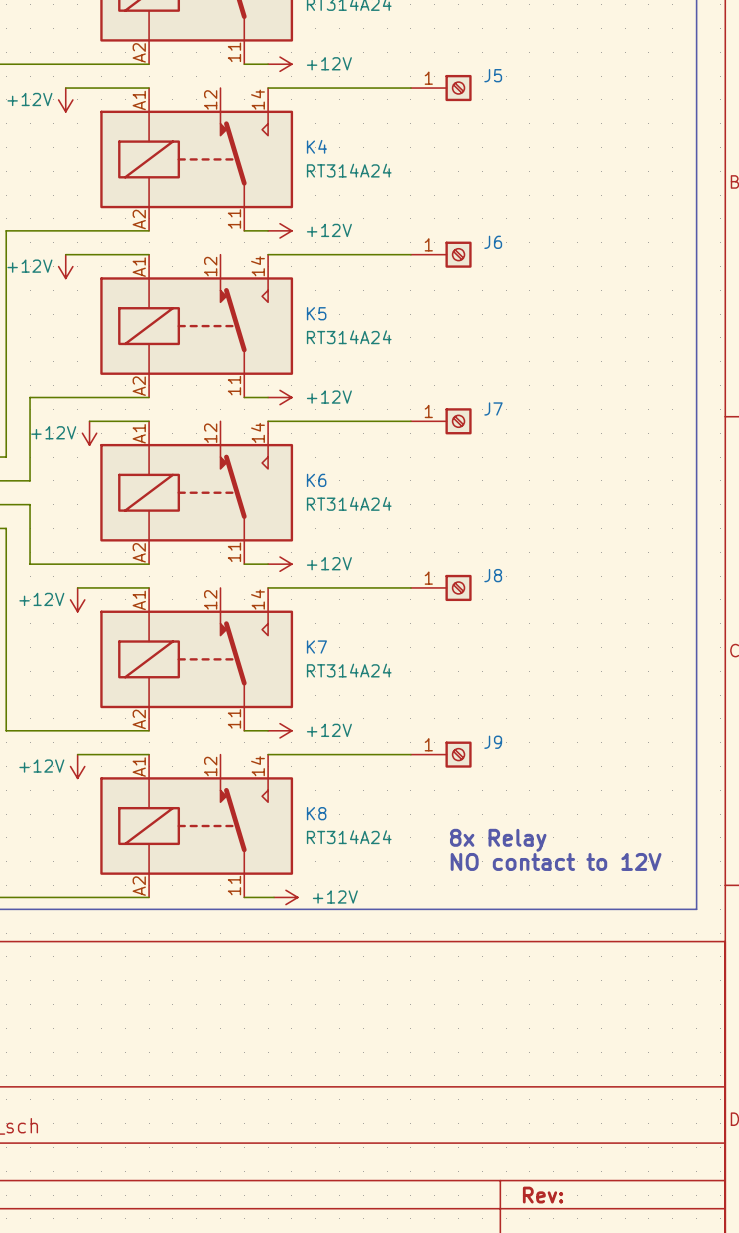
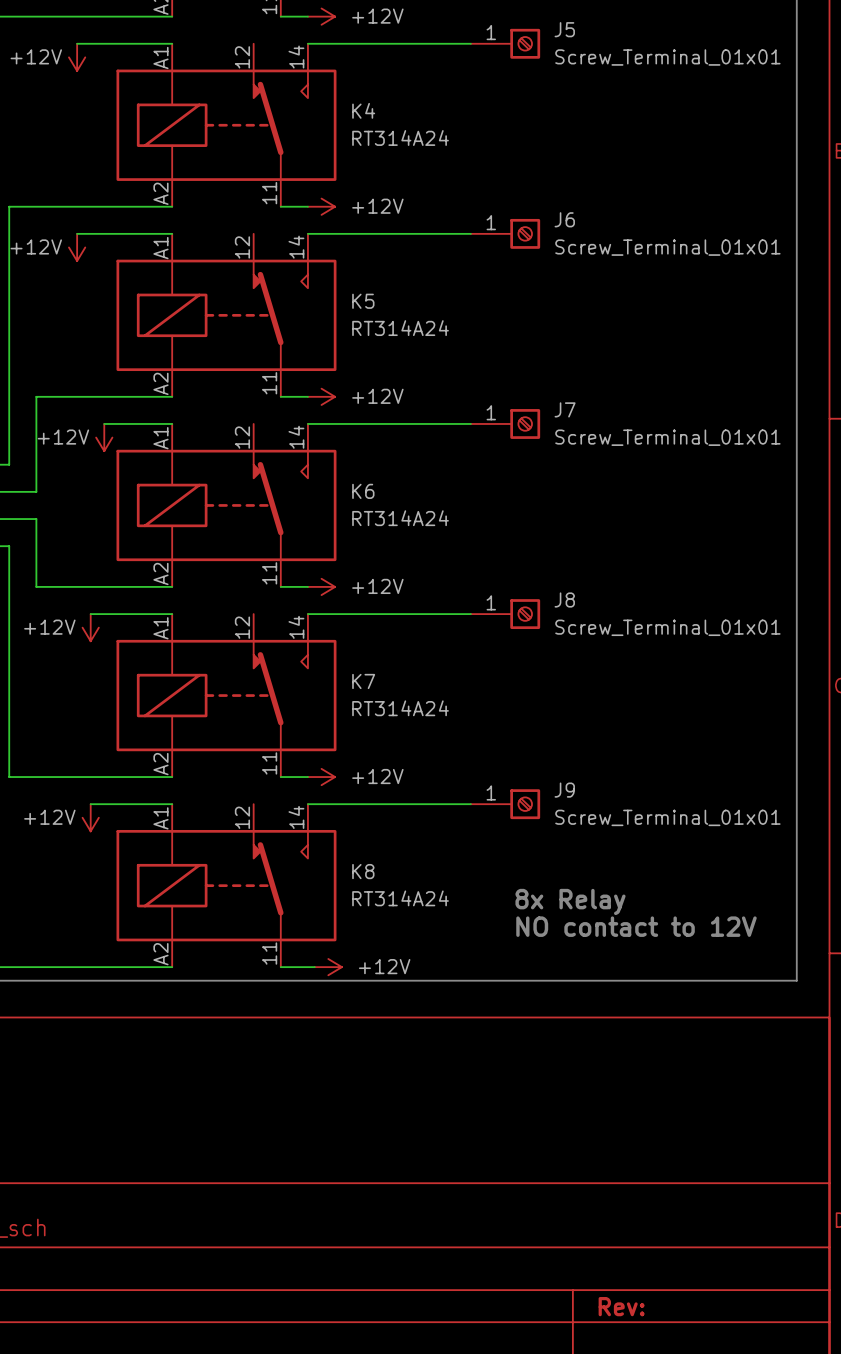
J5 value: none -> Screw_Terminal_01x01 (667, 57)
J6 value: none -> Screw_Terminal_01x01 (667, 247)
J7 value: none -> Screw_Terminal_01x01 (667, 437)
J8 value: none -> Screw_Terminal_01x01 (667, 627)
J9 value: none -> Screw_Terminal_01x01 (667, 817)

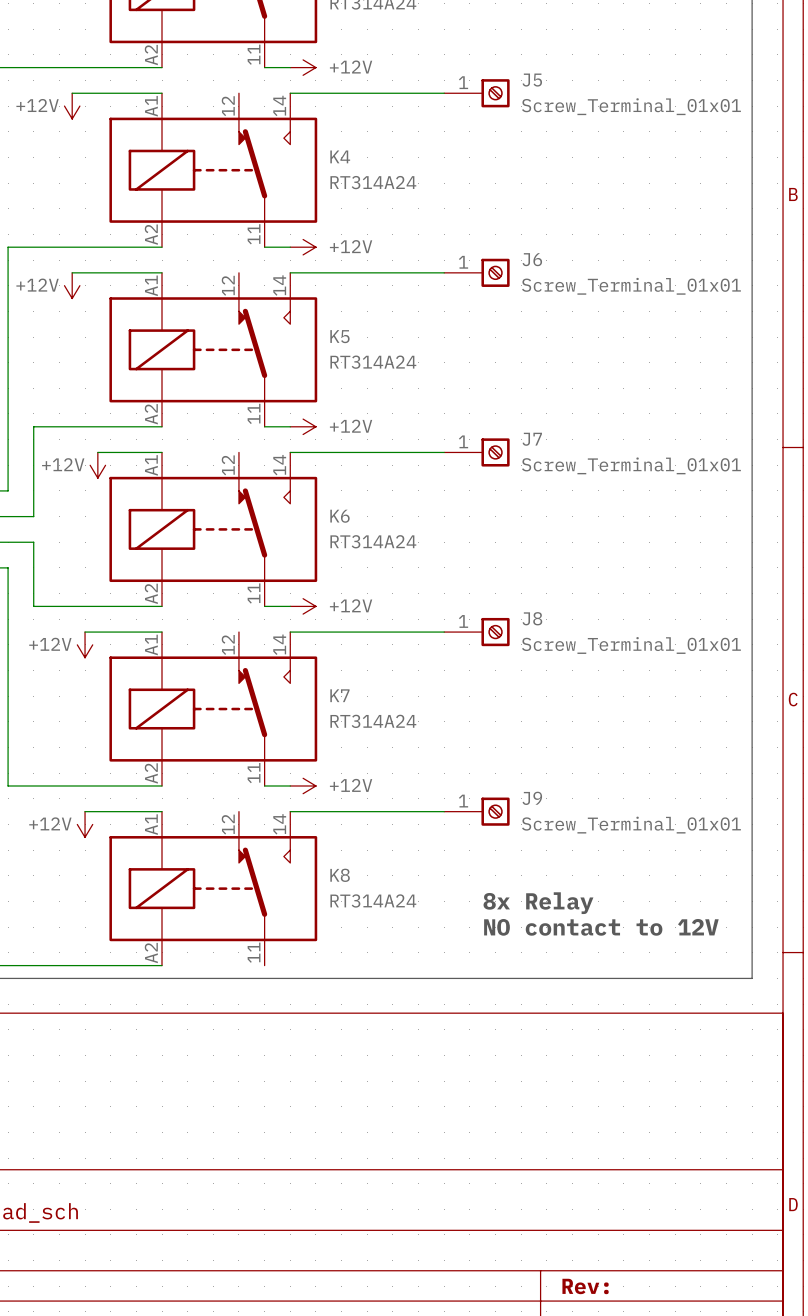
wire: (280, 967) (314, 967) -> none
power symbol: +12V (328, 967) -> none

